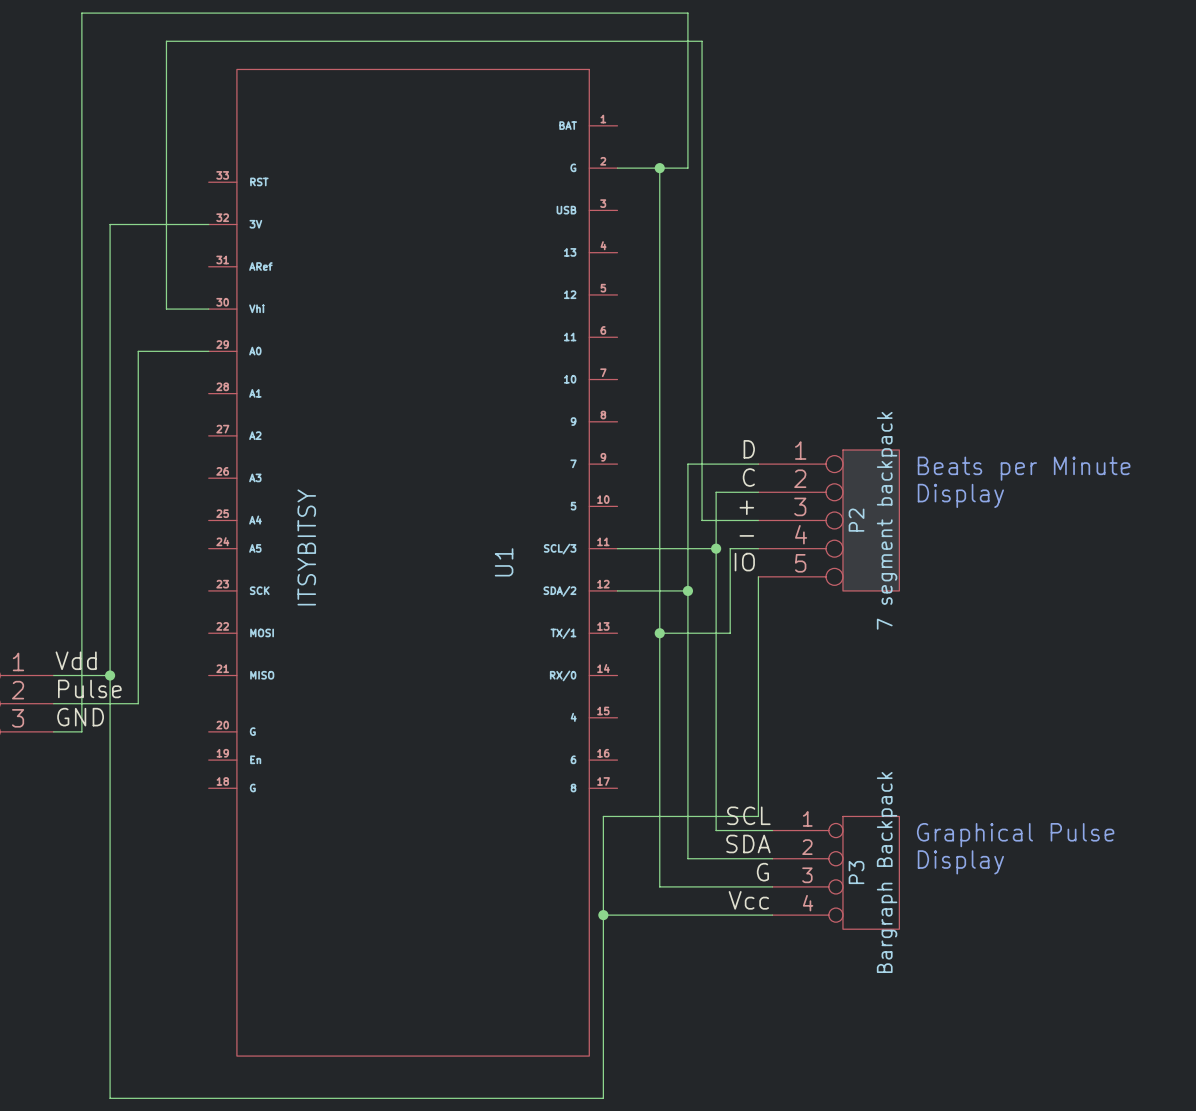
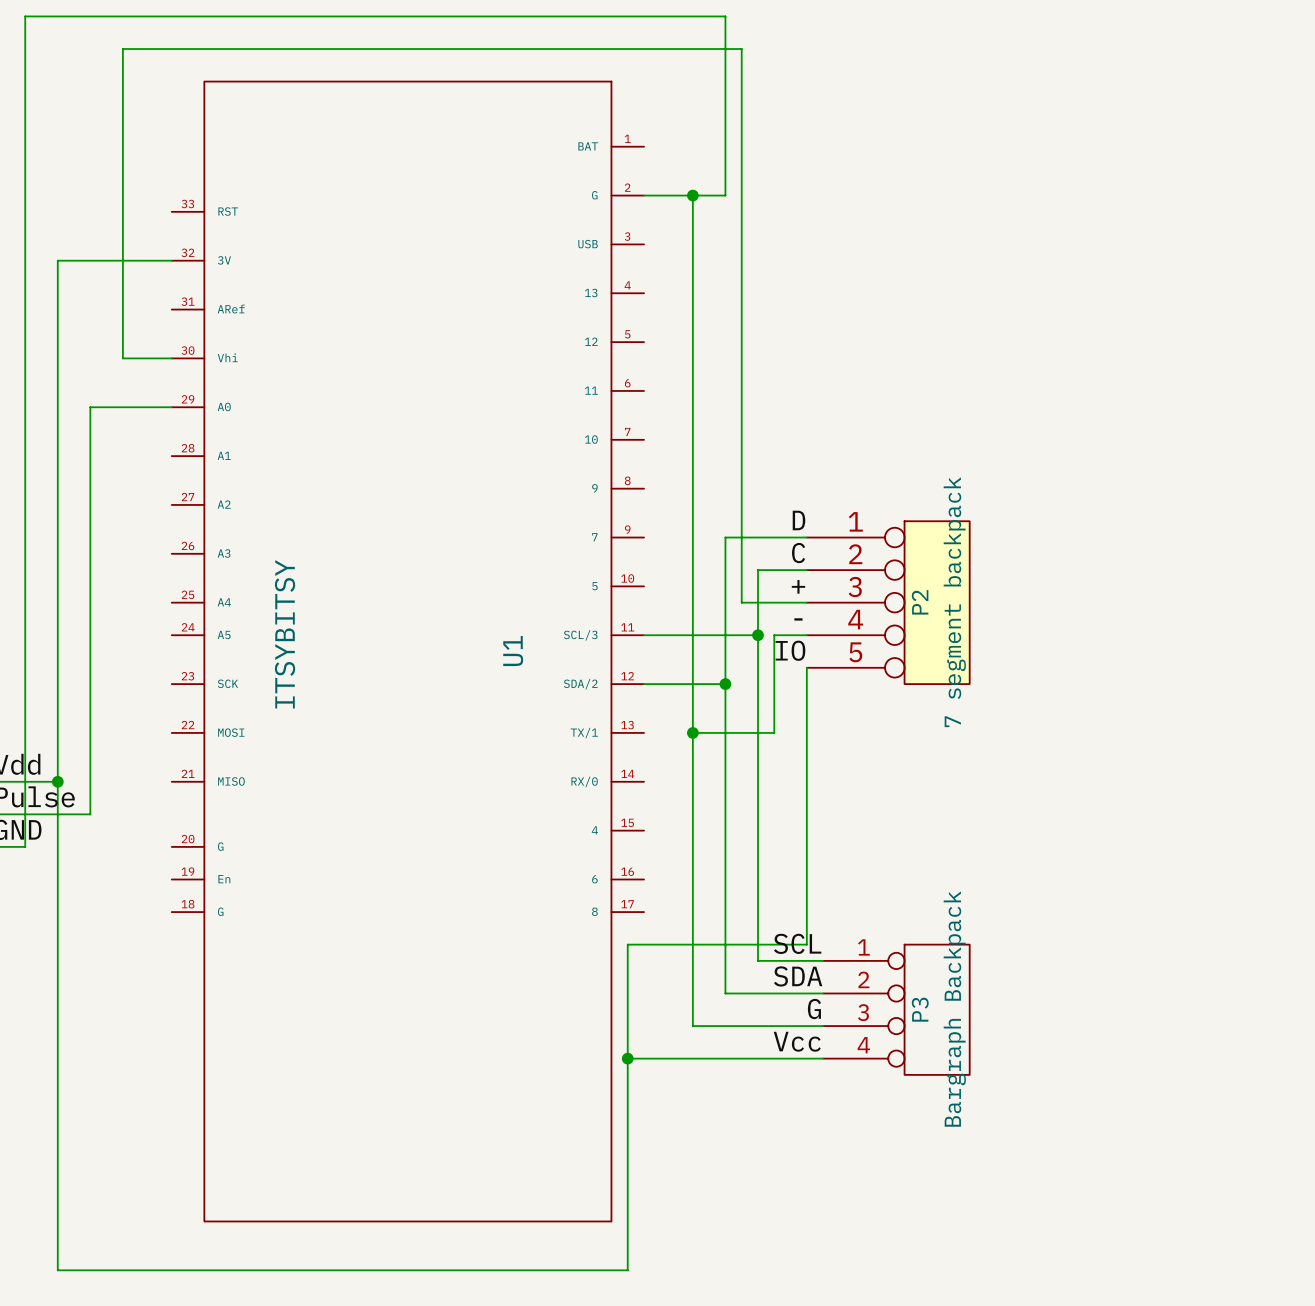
text: Beats per Minute (1024, 468) -> none
text: Display (960, 495) -> none
text: Graphical Pulse (1015, 835) -> none
text: Display (960, 862) -> none

